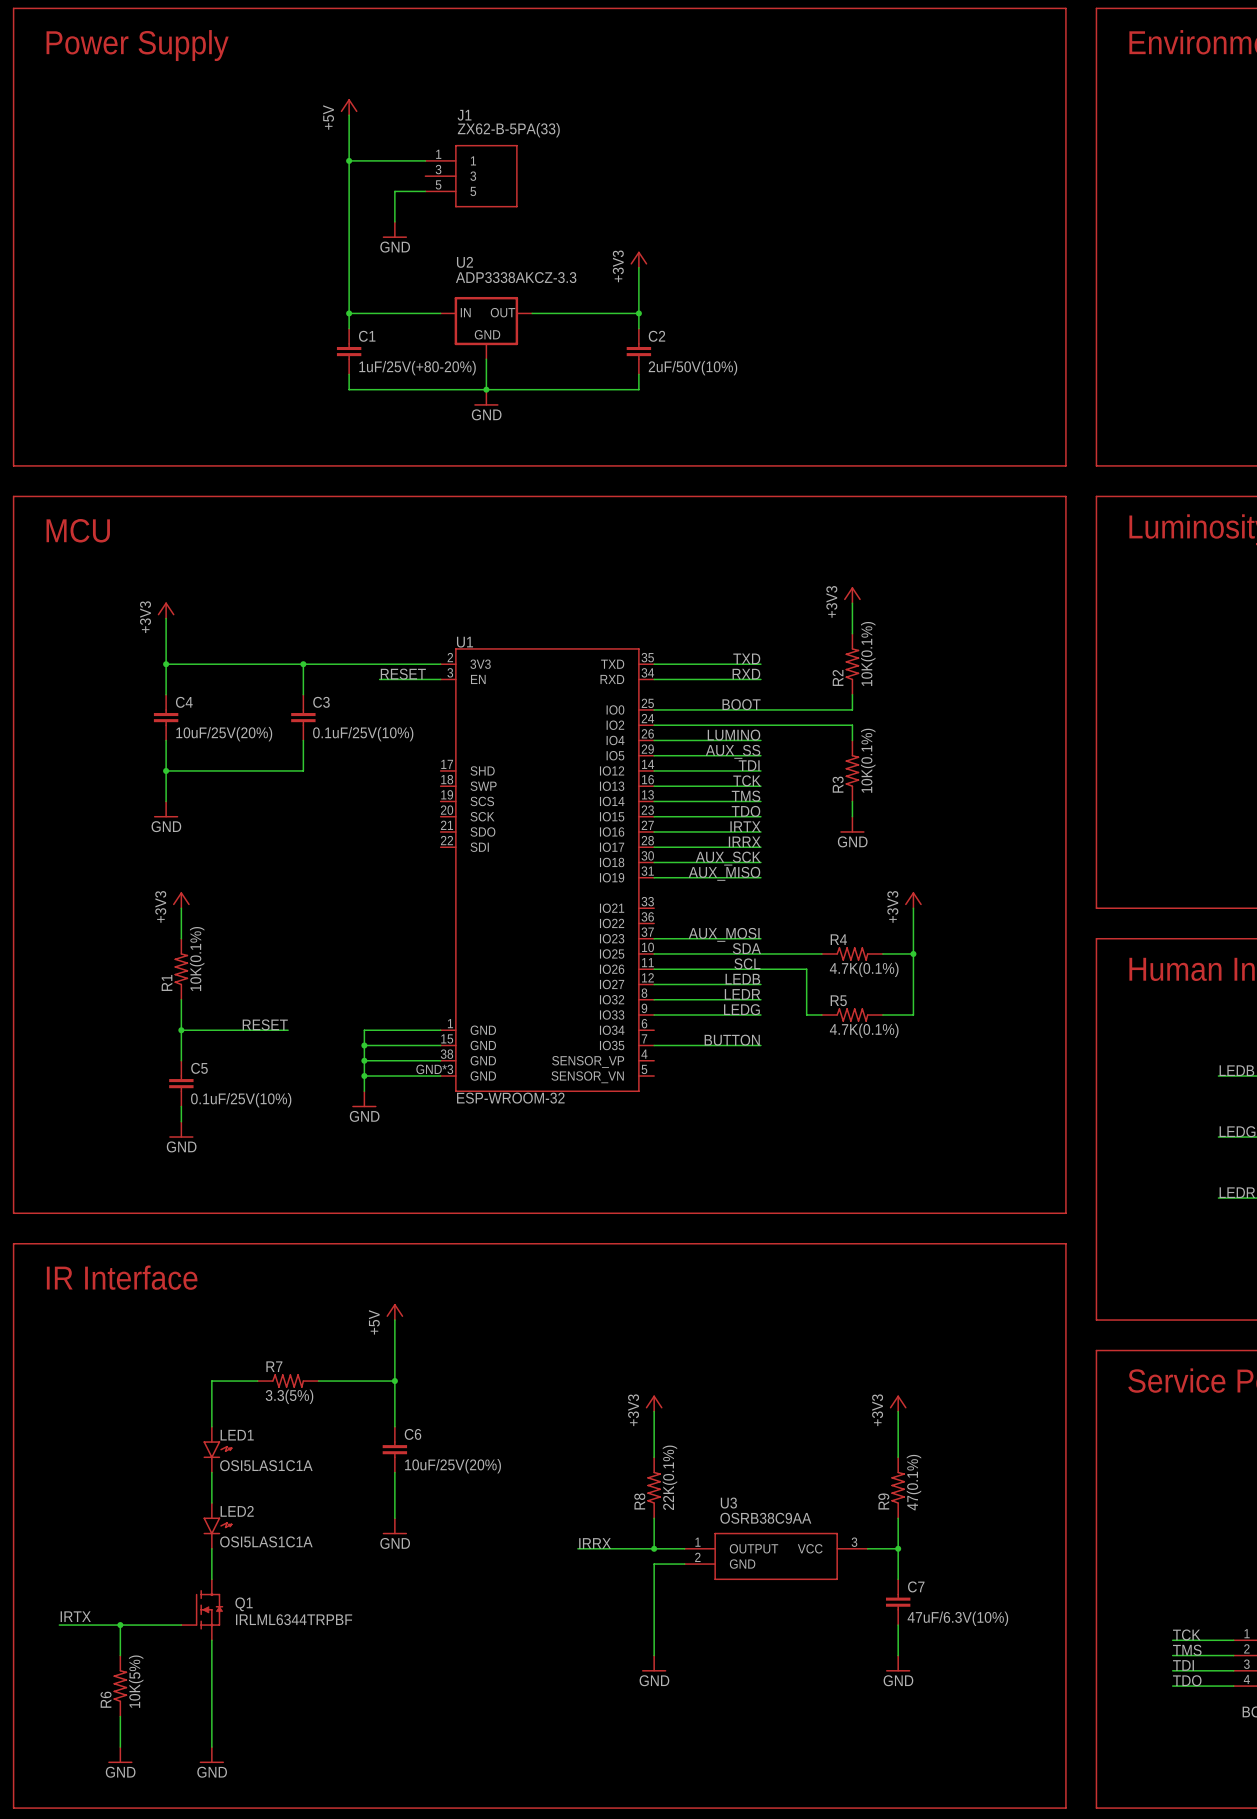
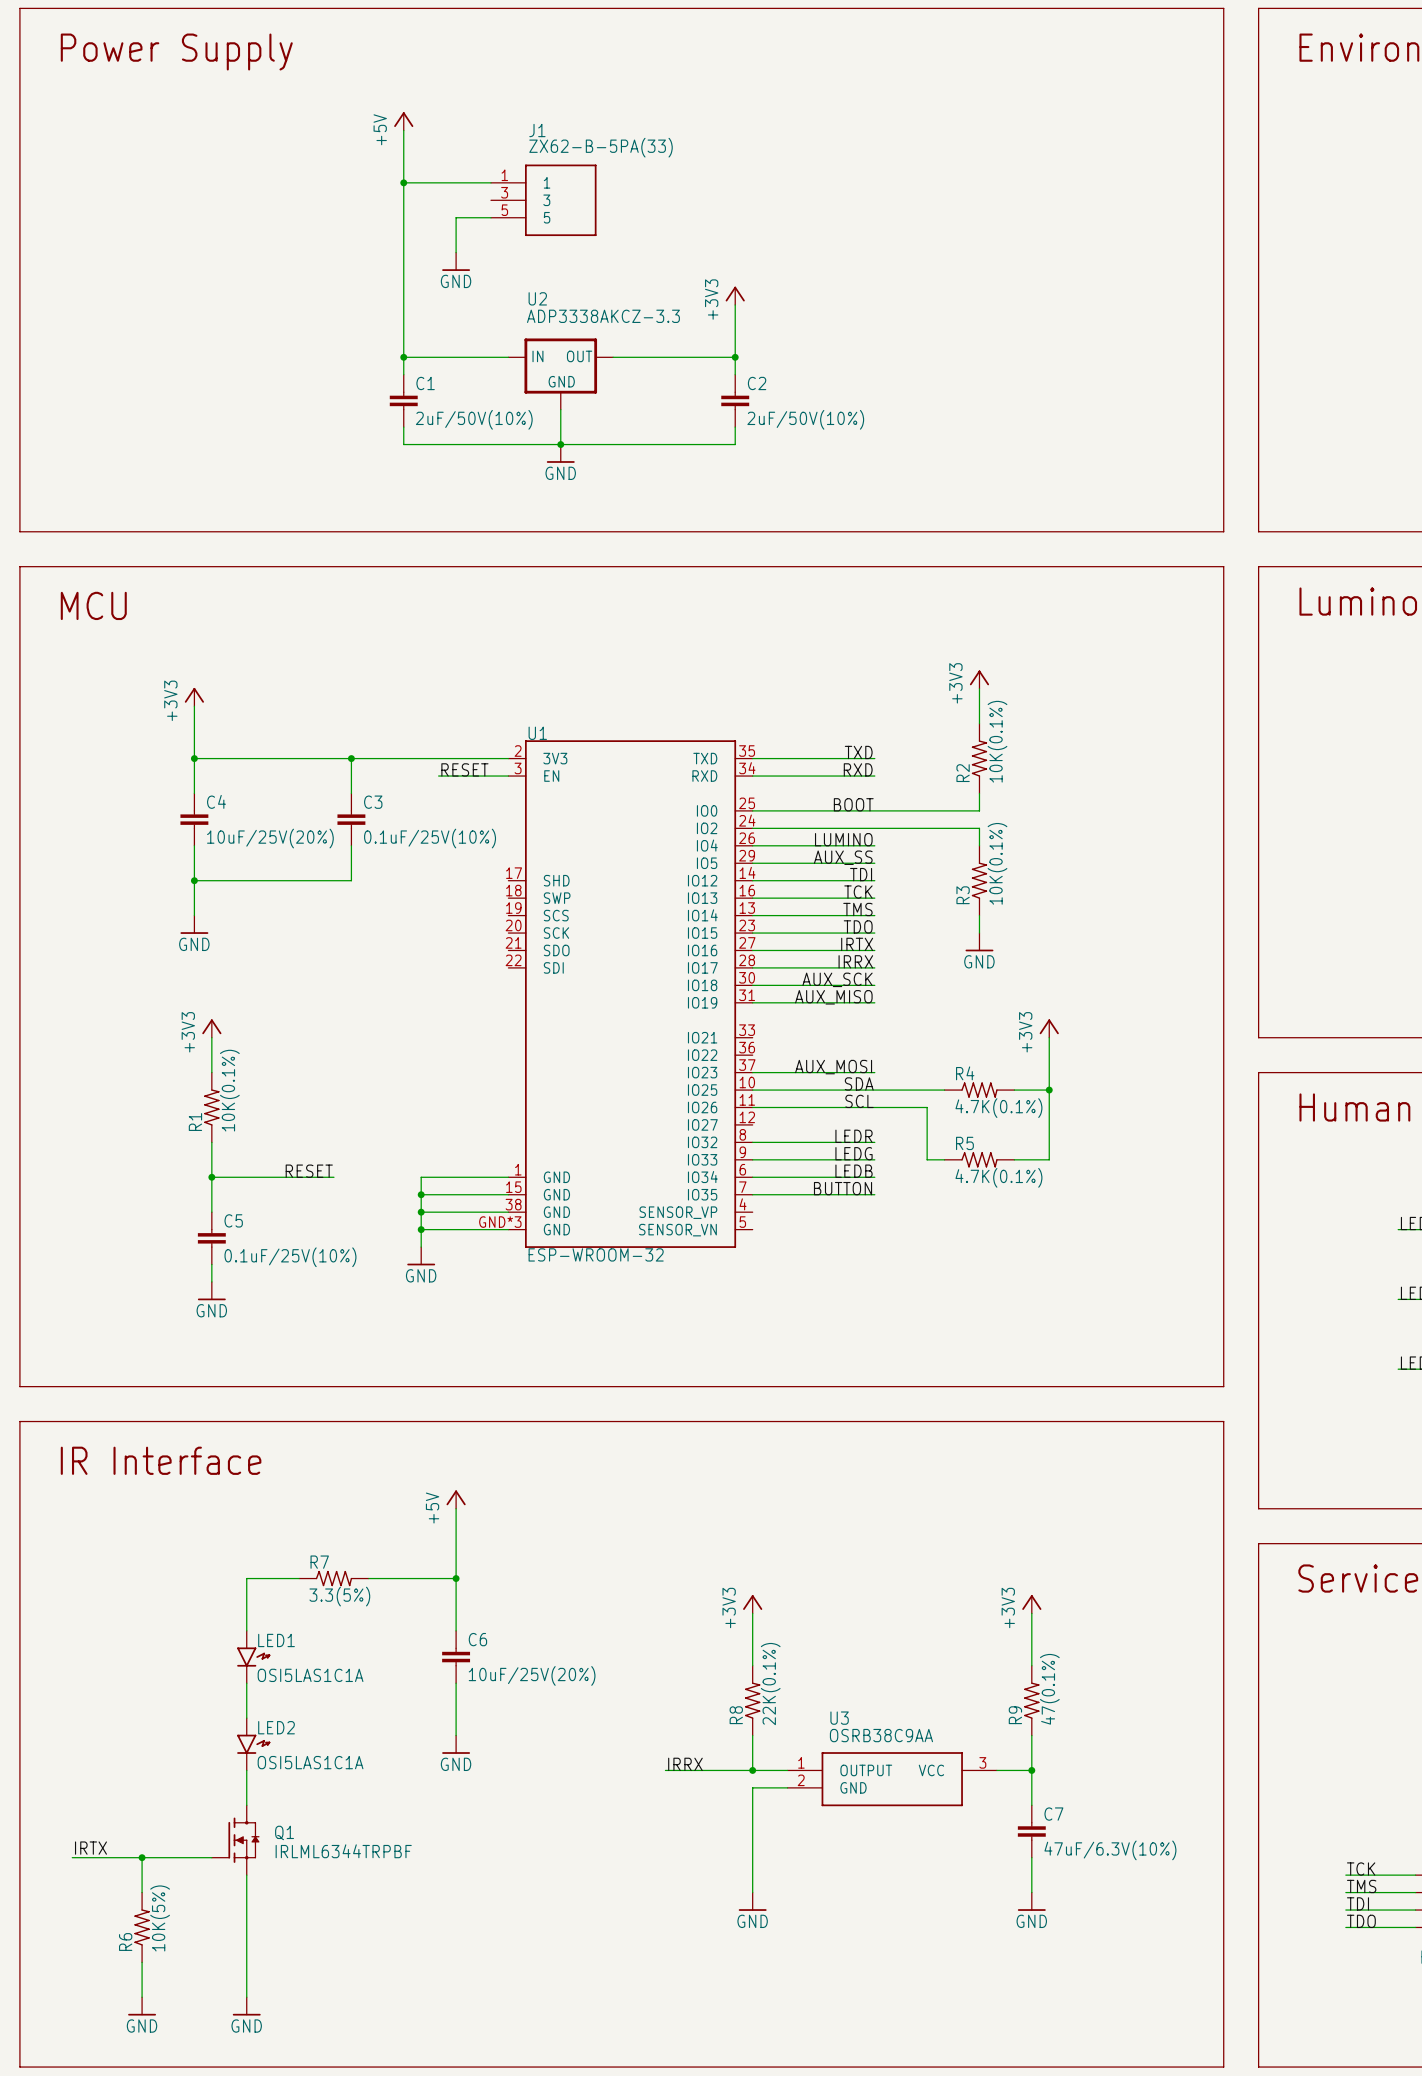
C1 value: 1uF/25V(+80-20%) (417, 368) -> 2uF/50V(10%) (474, 419)
label position: LEDB (742, 979) -> LEDB (854, 1171)
wire: (654, 984) (760, 984) -> (752, 1177) (874, 1177)

